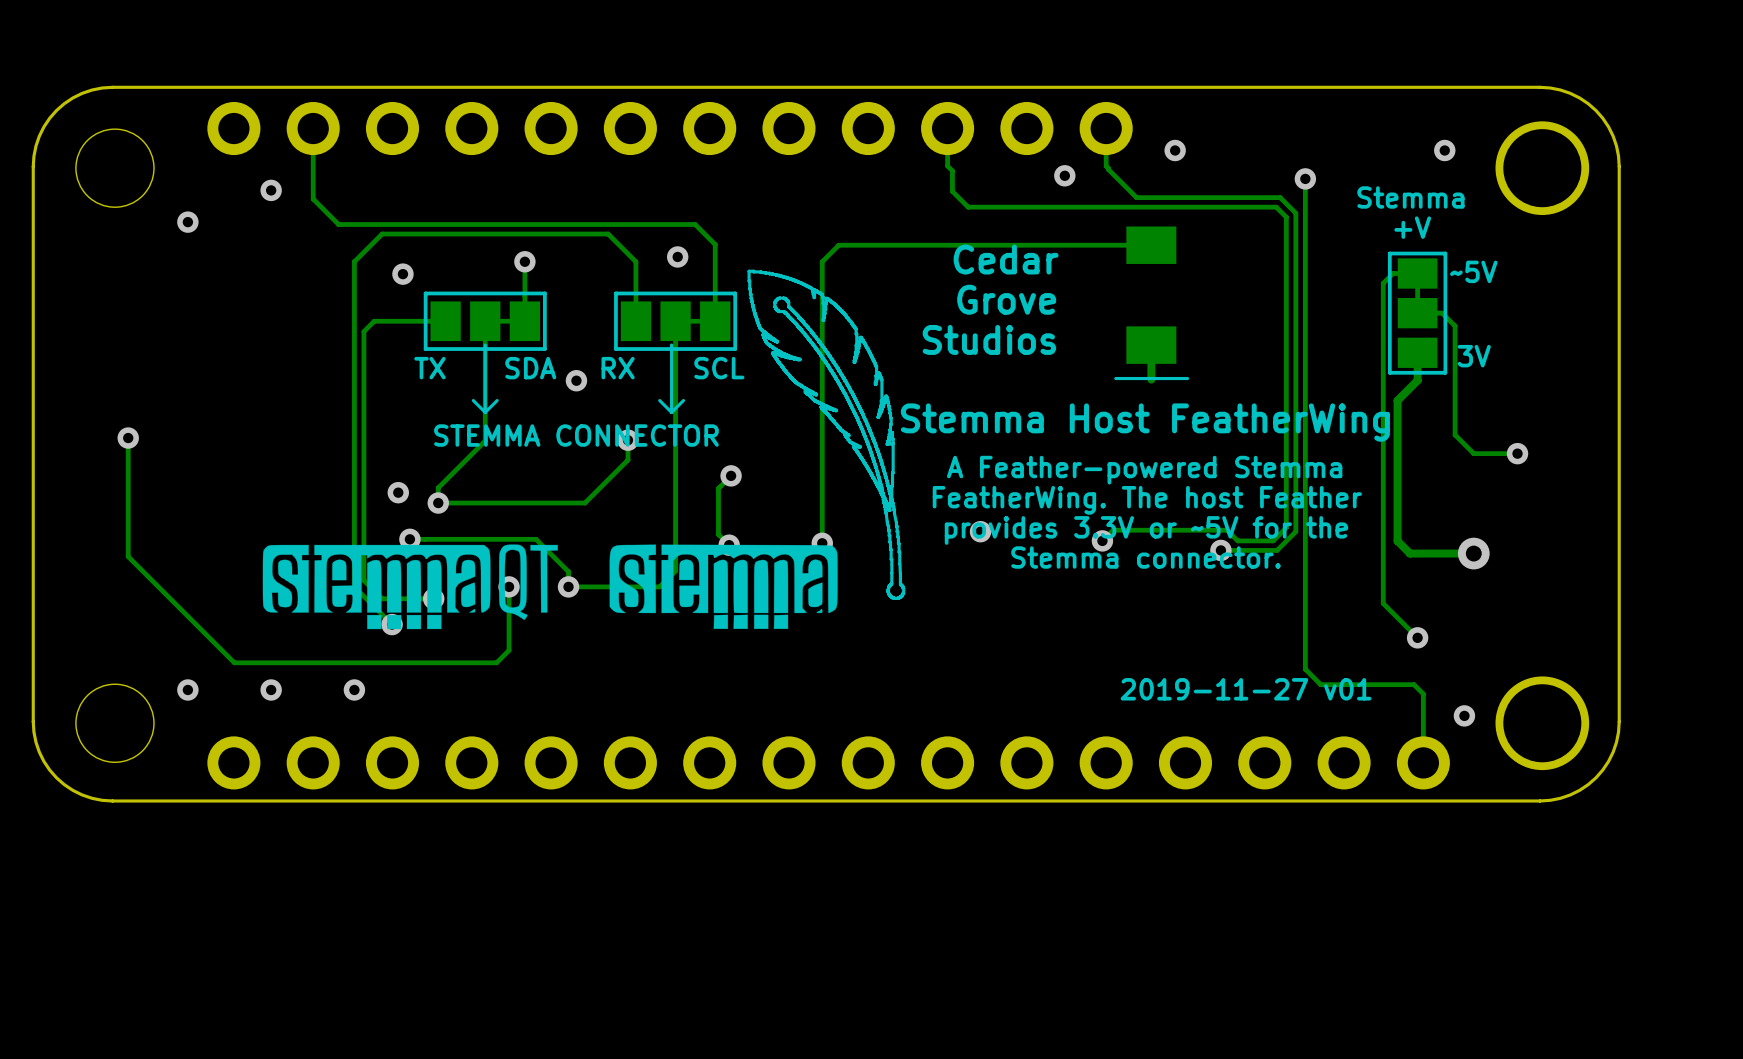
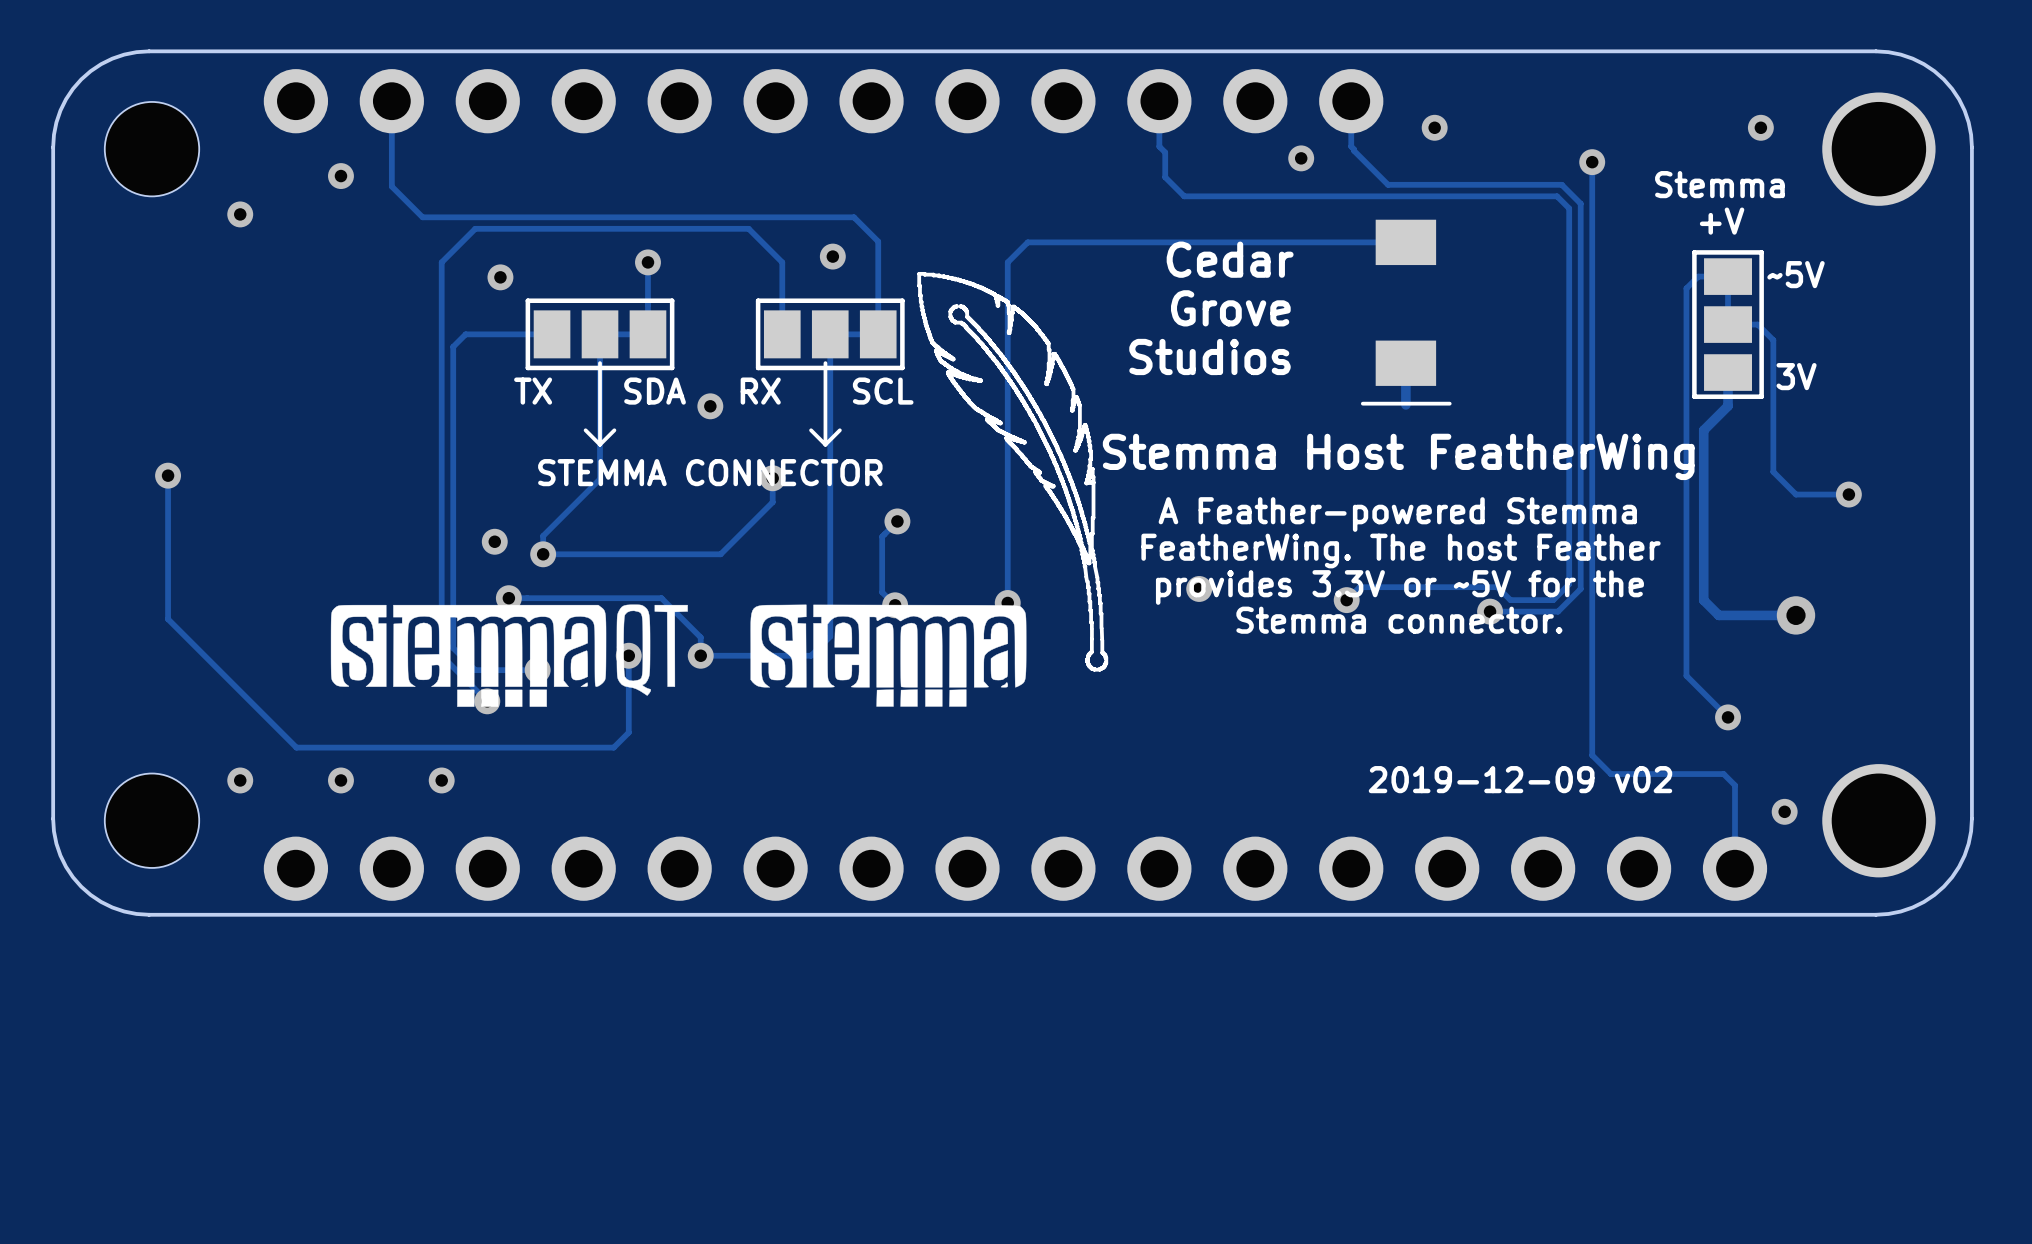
text: 2019-11-27 v01 (1246, 689) -> 2019-12-09 v02 (1520, 779)

